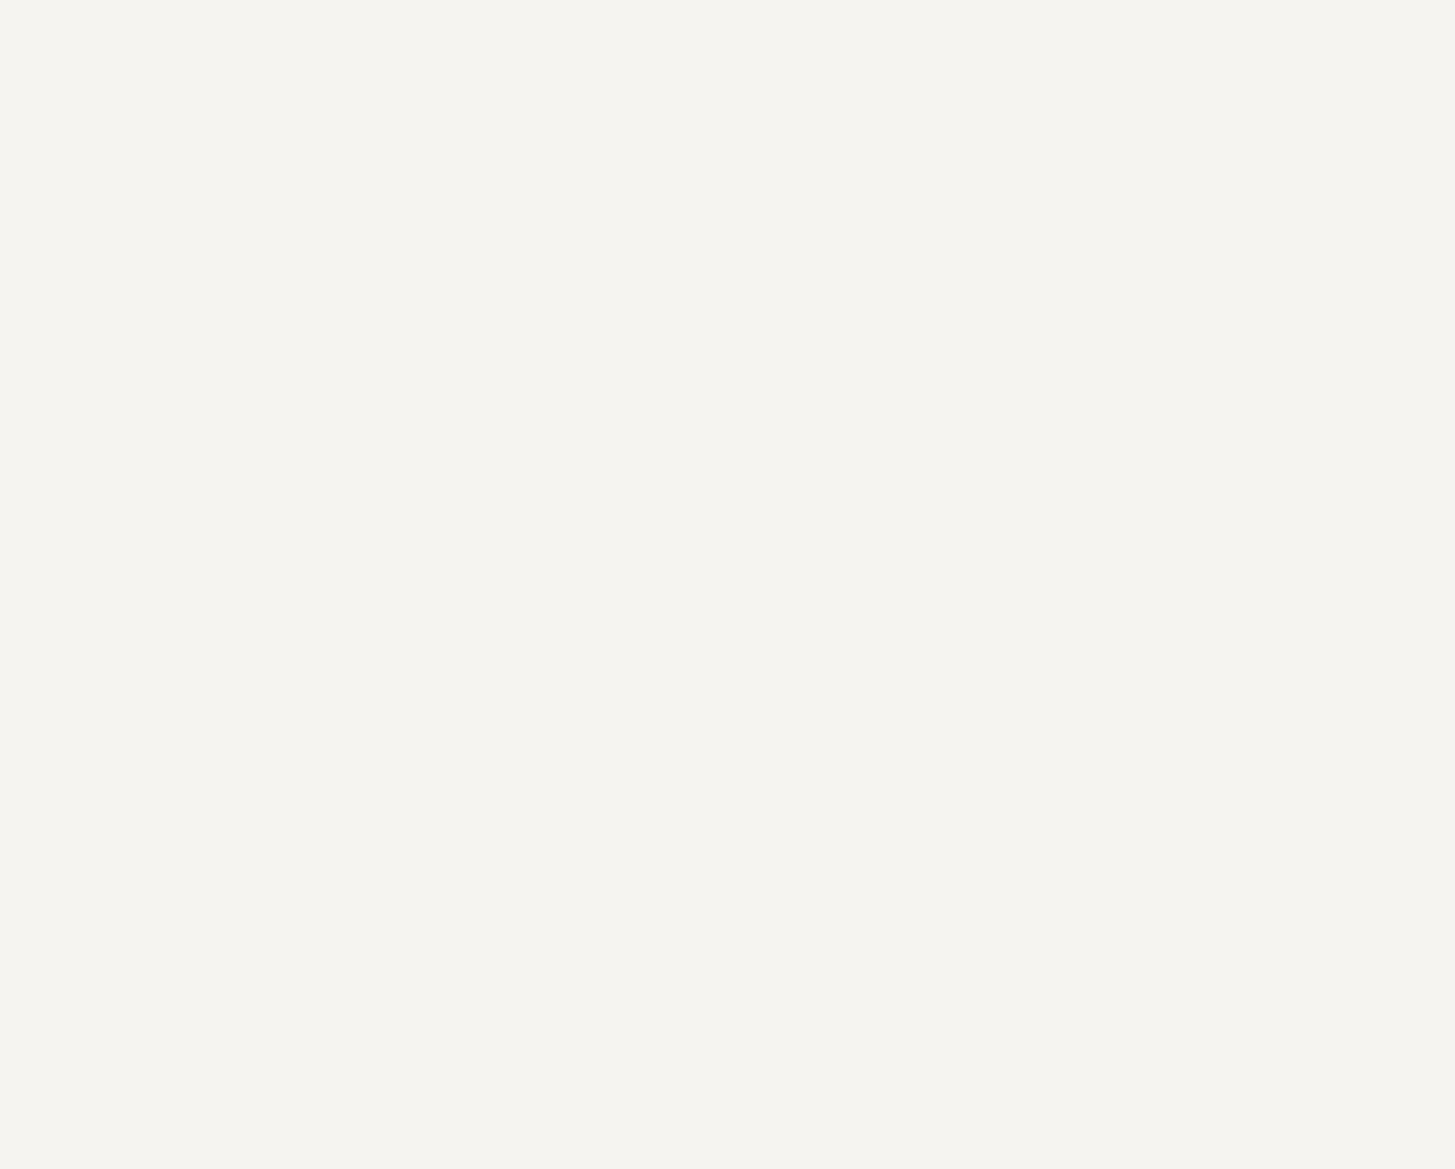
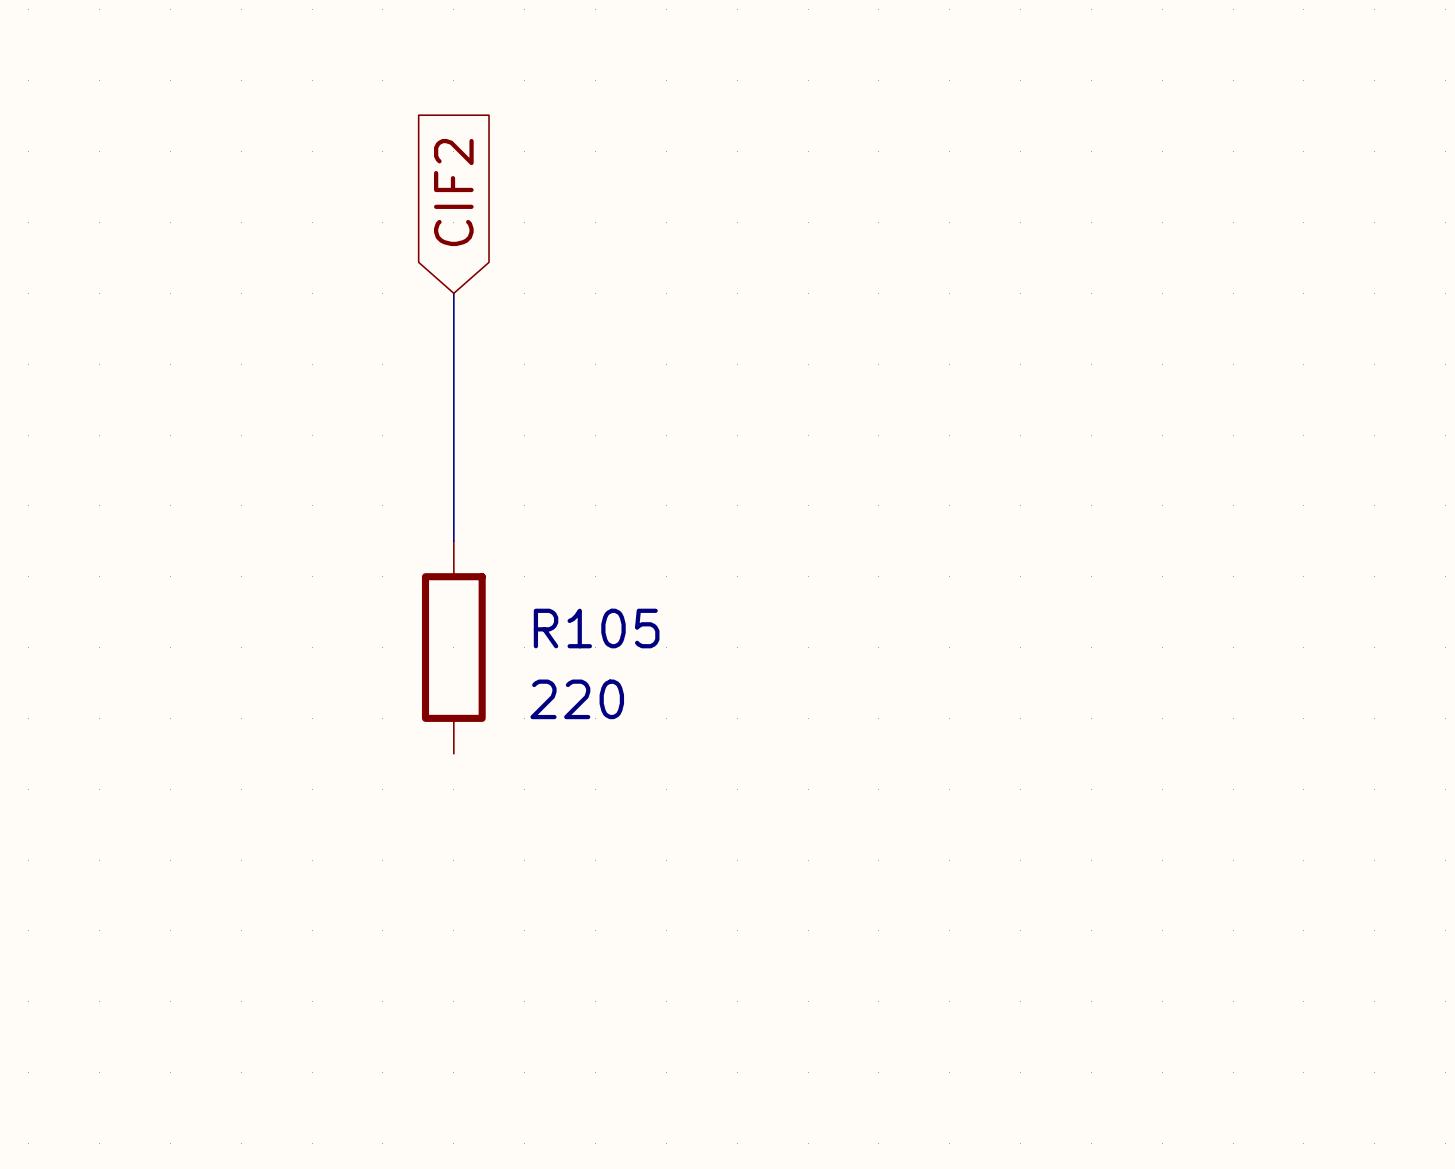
global label: none -> CIF2 (453, 192)
wire: none -> (453, 293) (453, 541)
R105: none -> 220 (453, 647)

